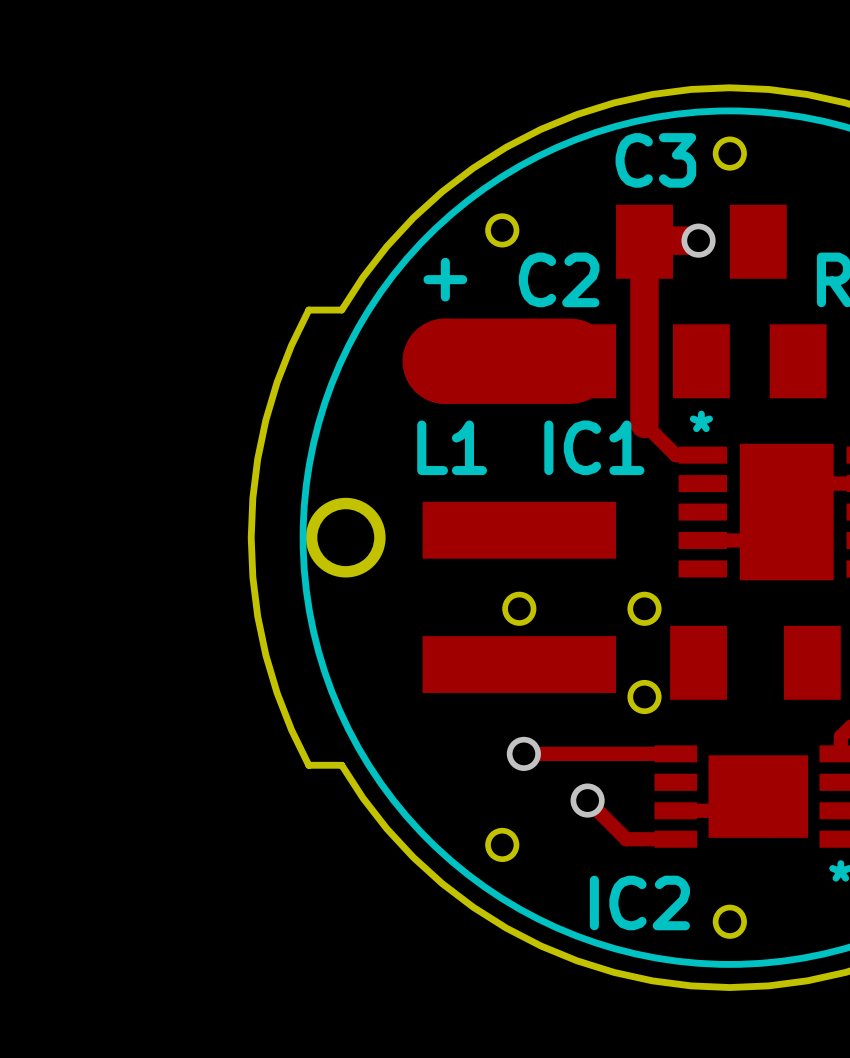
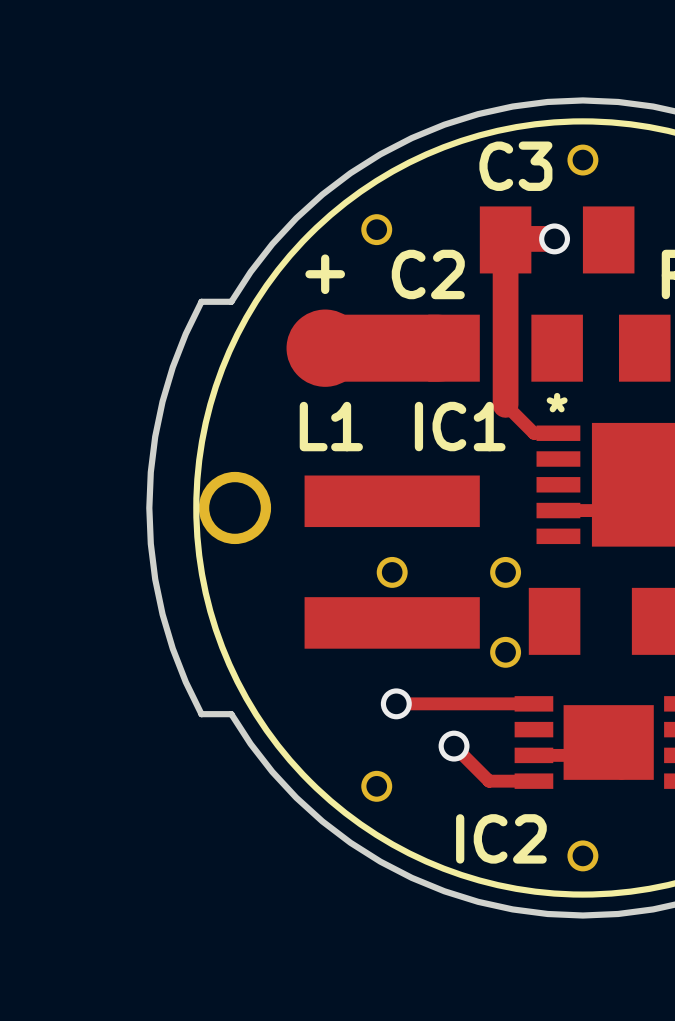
track width: thick (445, 361) (570, 361) -> thin (325, 348) (438, 348)

